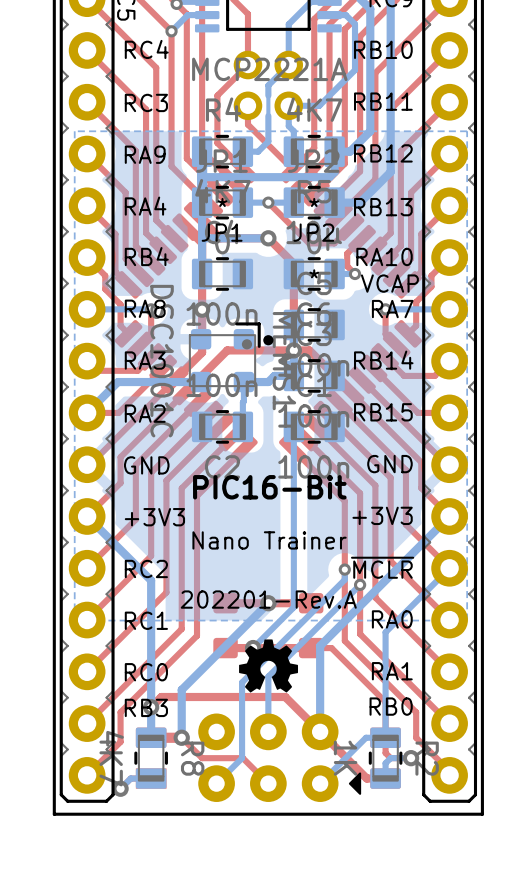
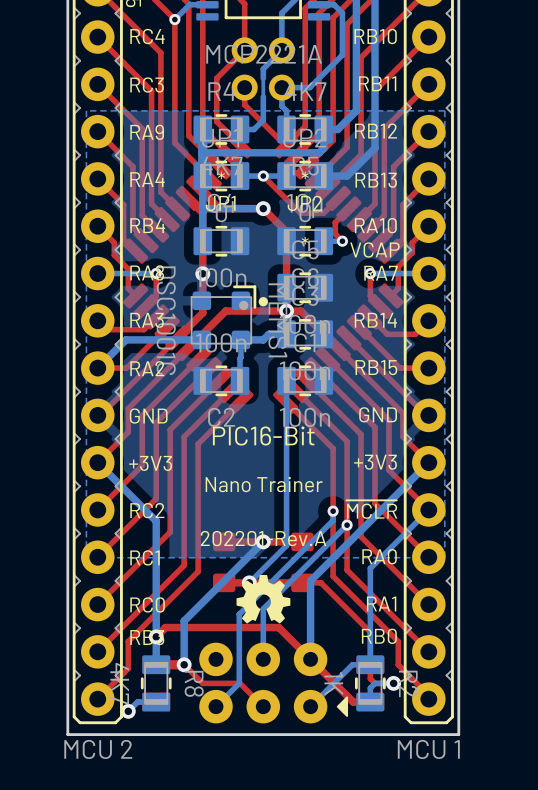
part value: none -> MCU 2 (98, 749)
part value: none -> MCU 1 (428, 749)

